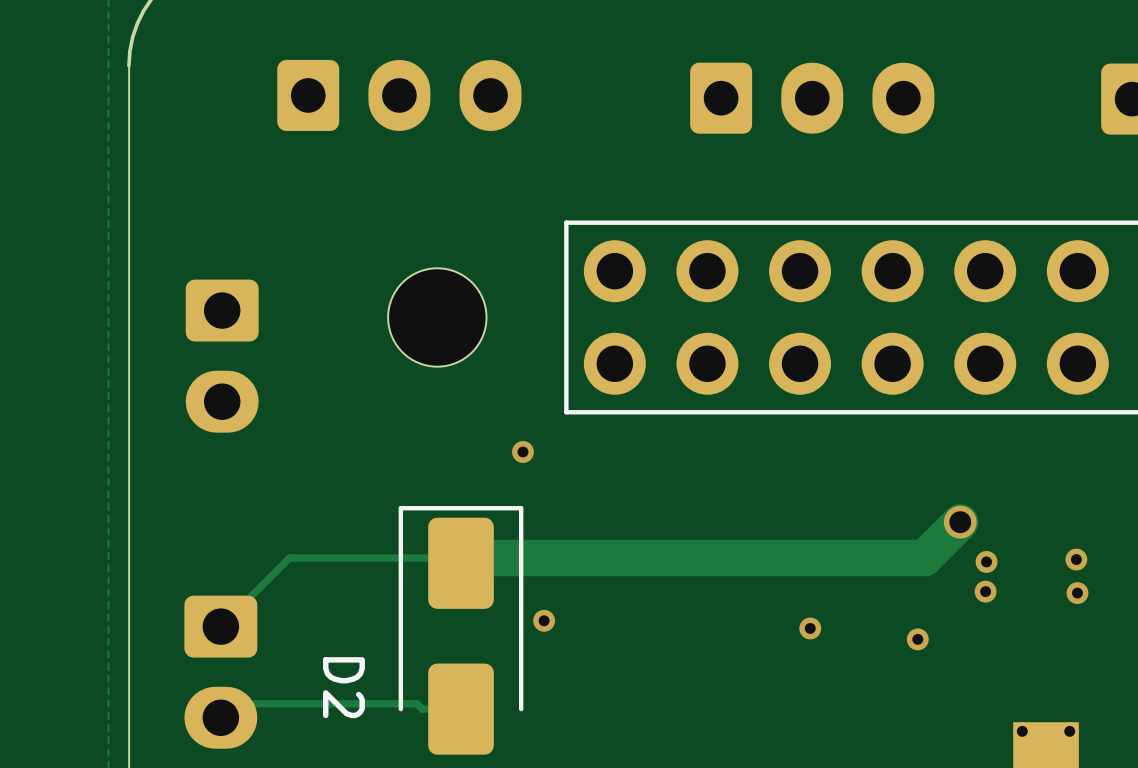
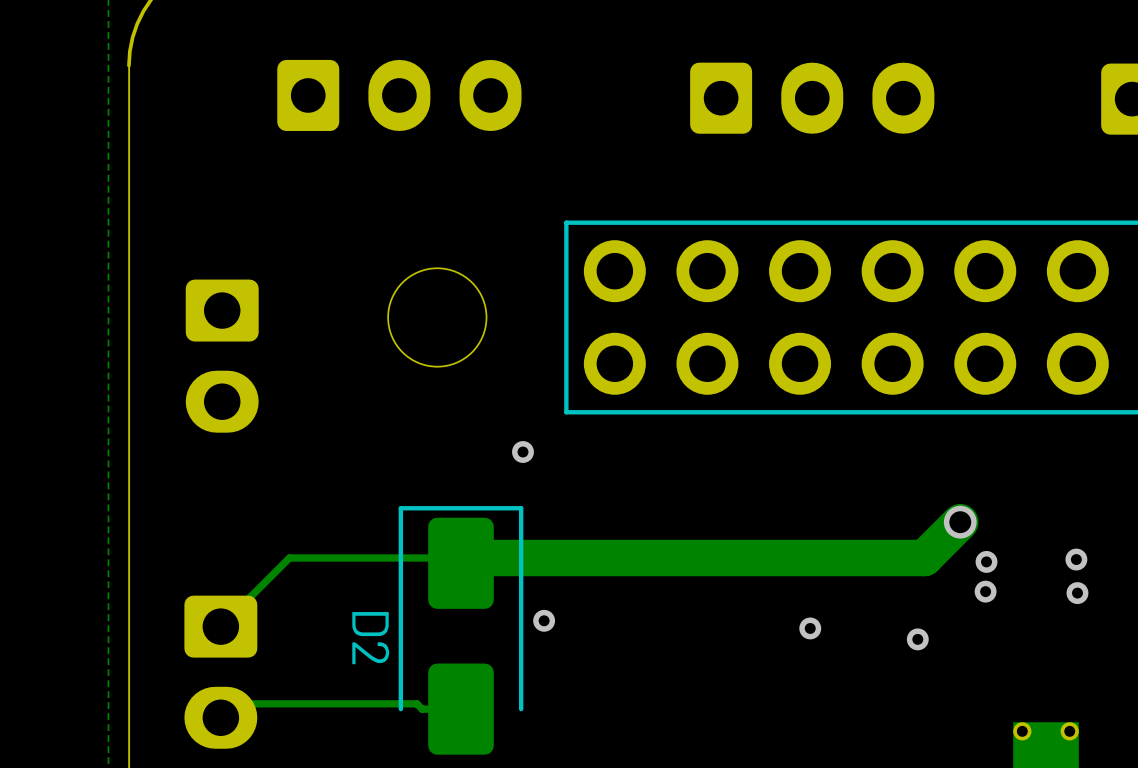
D2 name position: D2 (343, 687) -> D2 (370, 638)

